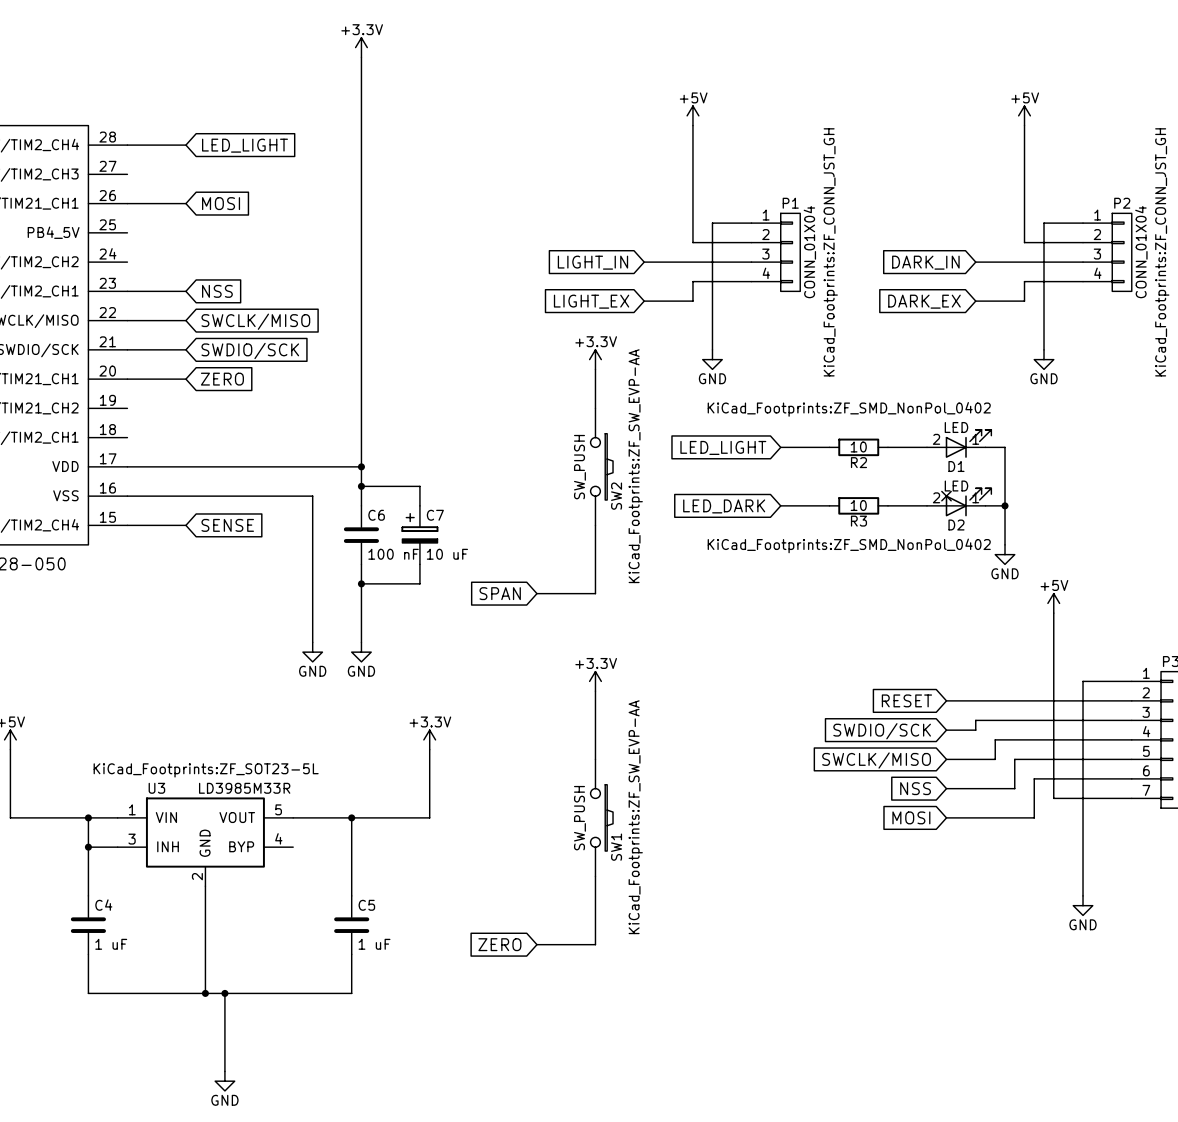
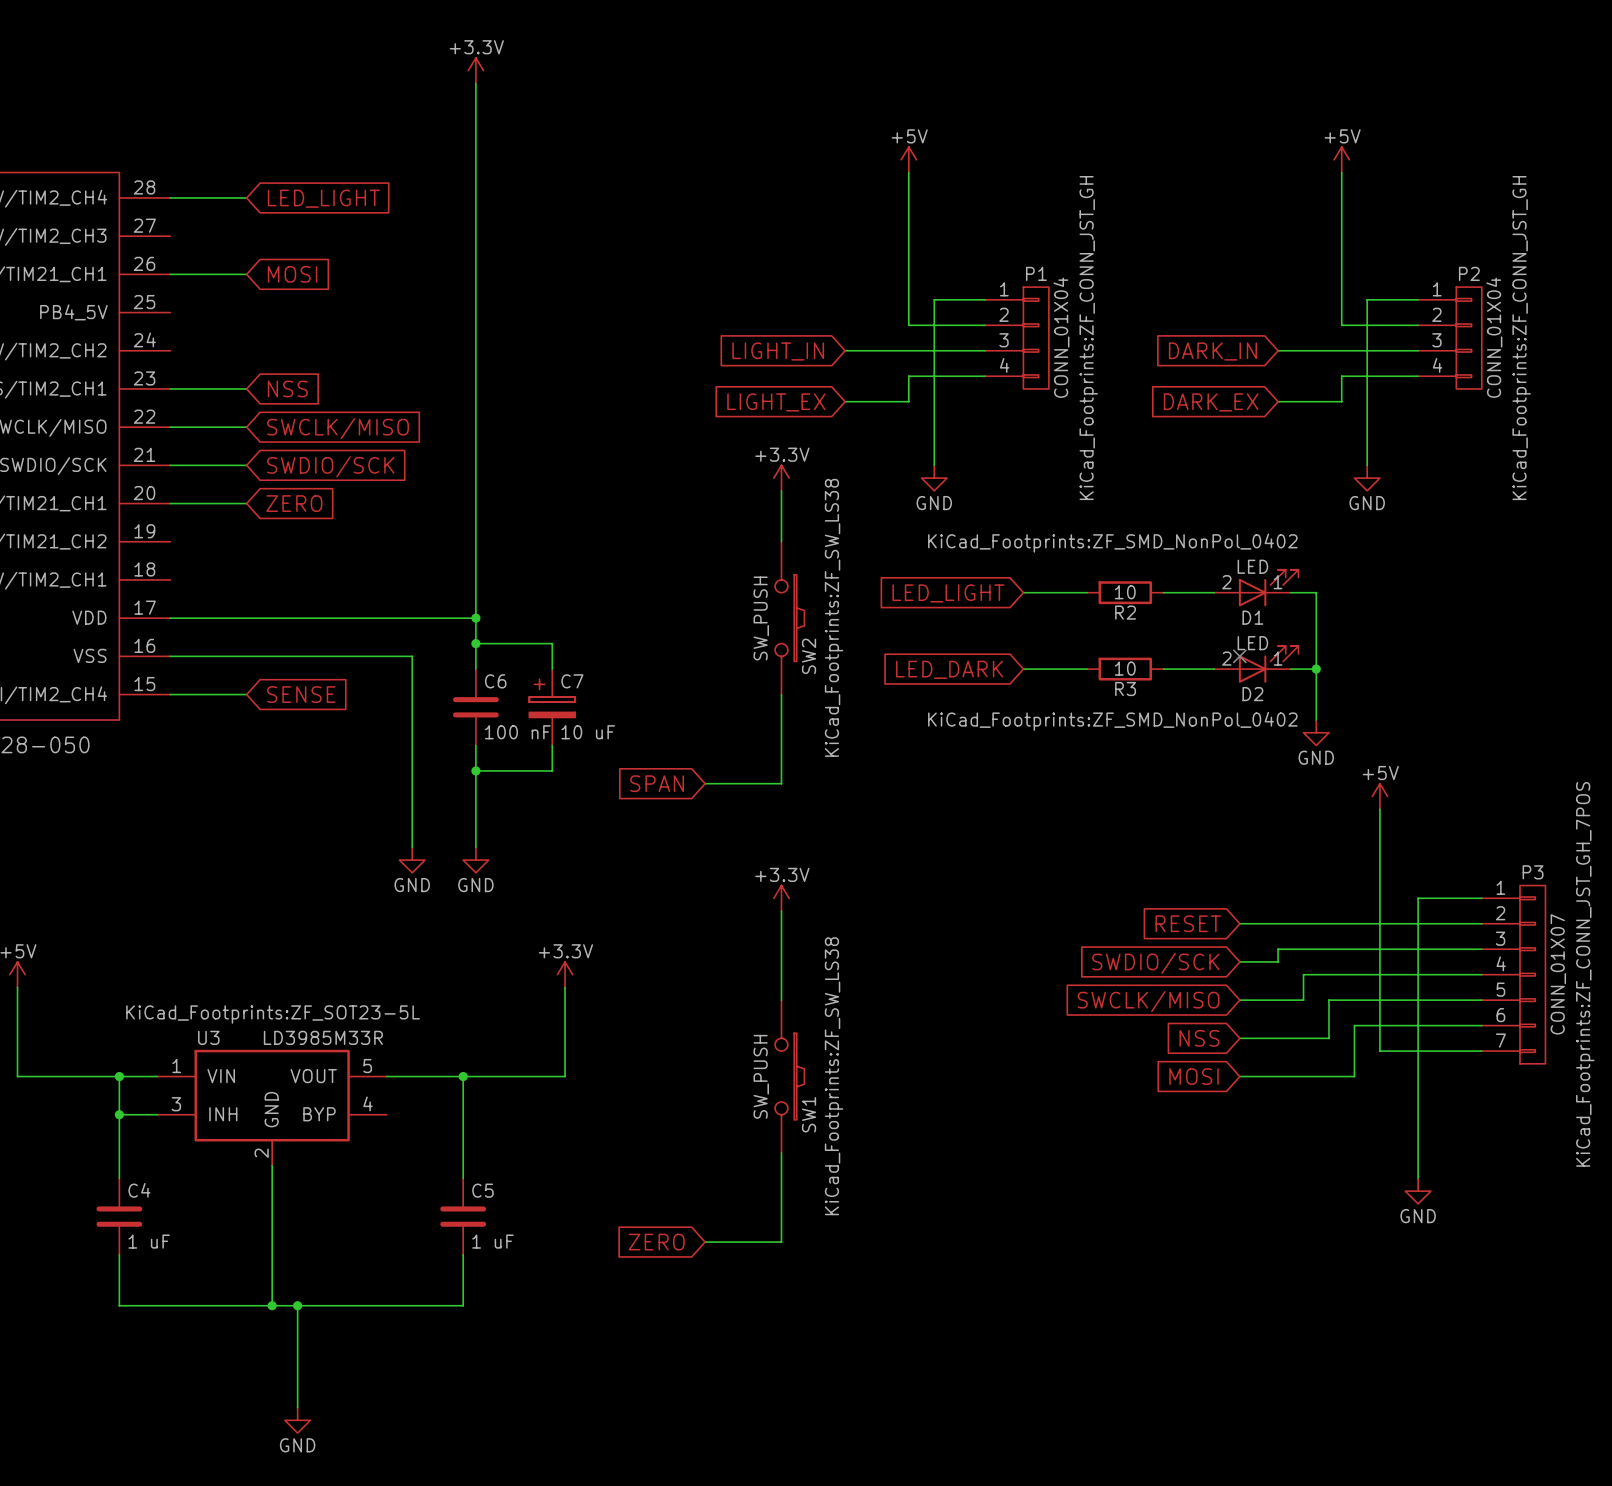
SW2 text: KiCad_Footprints:ZF_SW_EVP-AA (635, 466) -> KiCad_Footprints:ZF_SW_LS38 (834, 617)
SW1 text: KiCad_Footprints:ZF_SW_EVP-AA (635, 817) -> KiCad_Footprints:ZF_SW_LS38 (834, 1076)

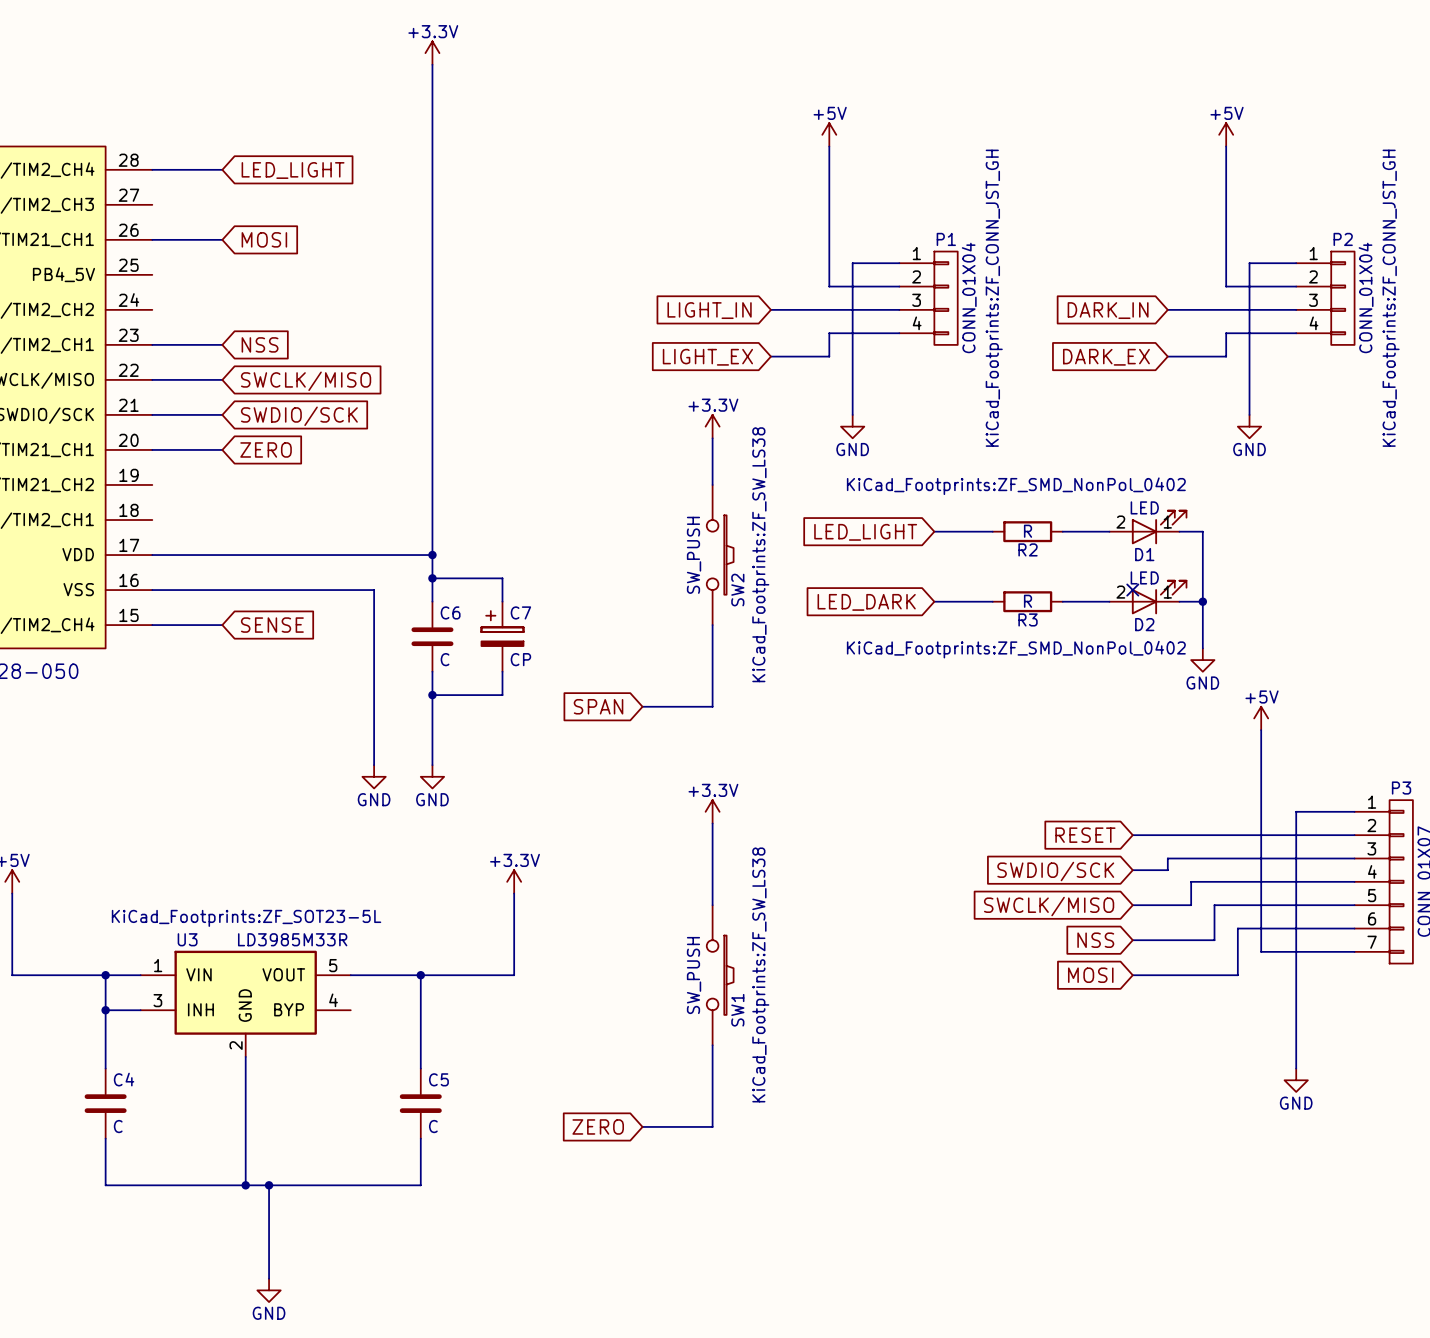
R2 value: 10 (1125, 592) -> R (1028, 531)
R3 value: 10 (1125, 668) -> R (1028, 601)
C6 value: 100 nF (517, 732) -> C (445, 659)
C7 value: 10 uF (588, 732) -> CP (520, 659)
C4 value: 1 uF (149, 1241) -> C (118, 1126)
C5 value: 1 uF (492, 1241) -> C (433, 1126)

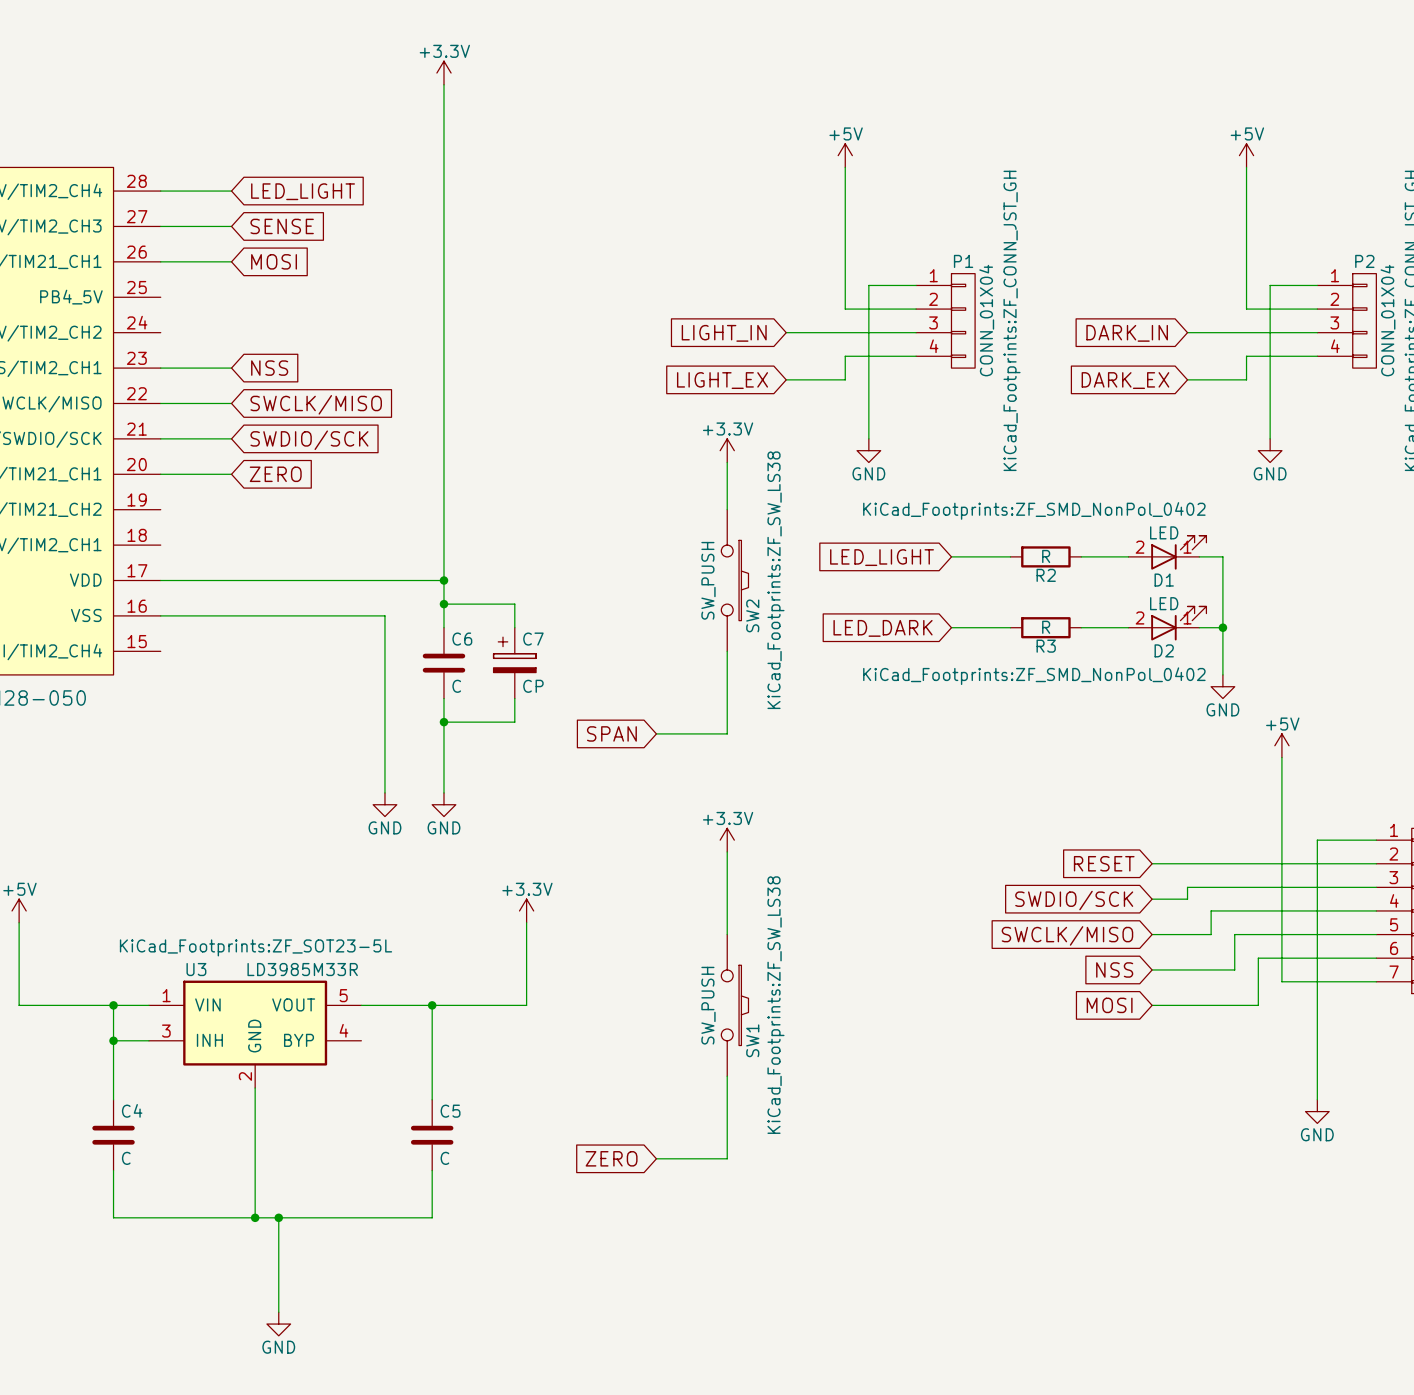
wire: none -> (160, 226) (231, 226)
global label: none -> SENSE (282, 226)
no-connect mark: (1132, 590) -> none
wire: (152, 625) (222, 625) -> none
global label: SENSE (272, 625) -> none

